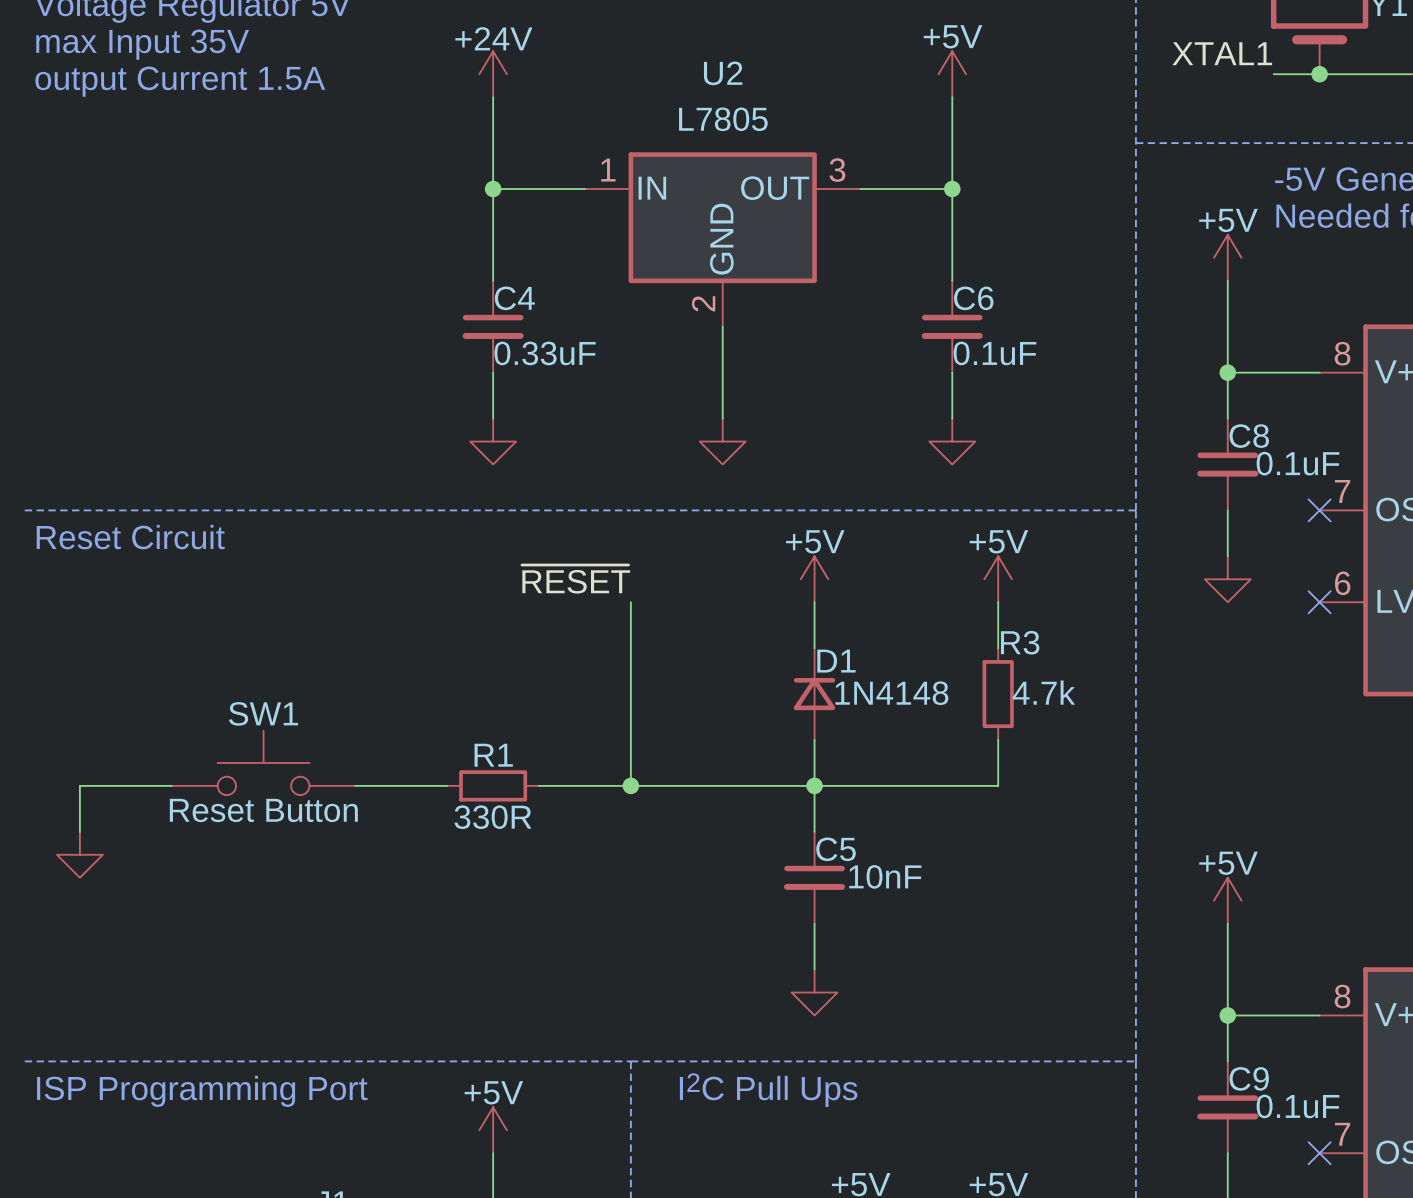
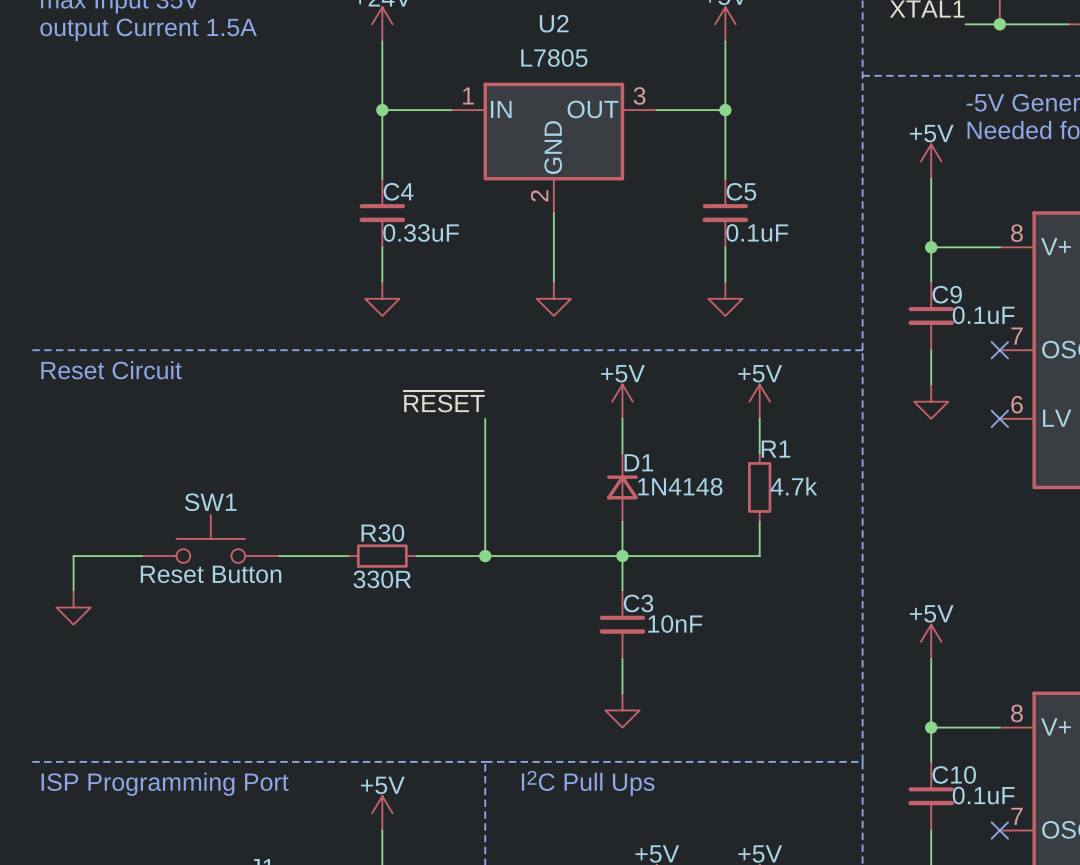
C6 name: C6 (973, 298) -> C5 (741, 191)
C8 name: C8 (1249, 436) -> C9 (947, 294)
R3 name: R3 (1020, 642) -> R1 (776, 449)
R1 name: R1 (493, 755) -> R30 (382, 533)
C5 name: C5 (836, 849) -> C3 (638, 603)
C9 name: C9 (1249, 1078) -> C10 (954, 774)

